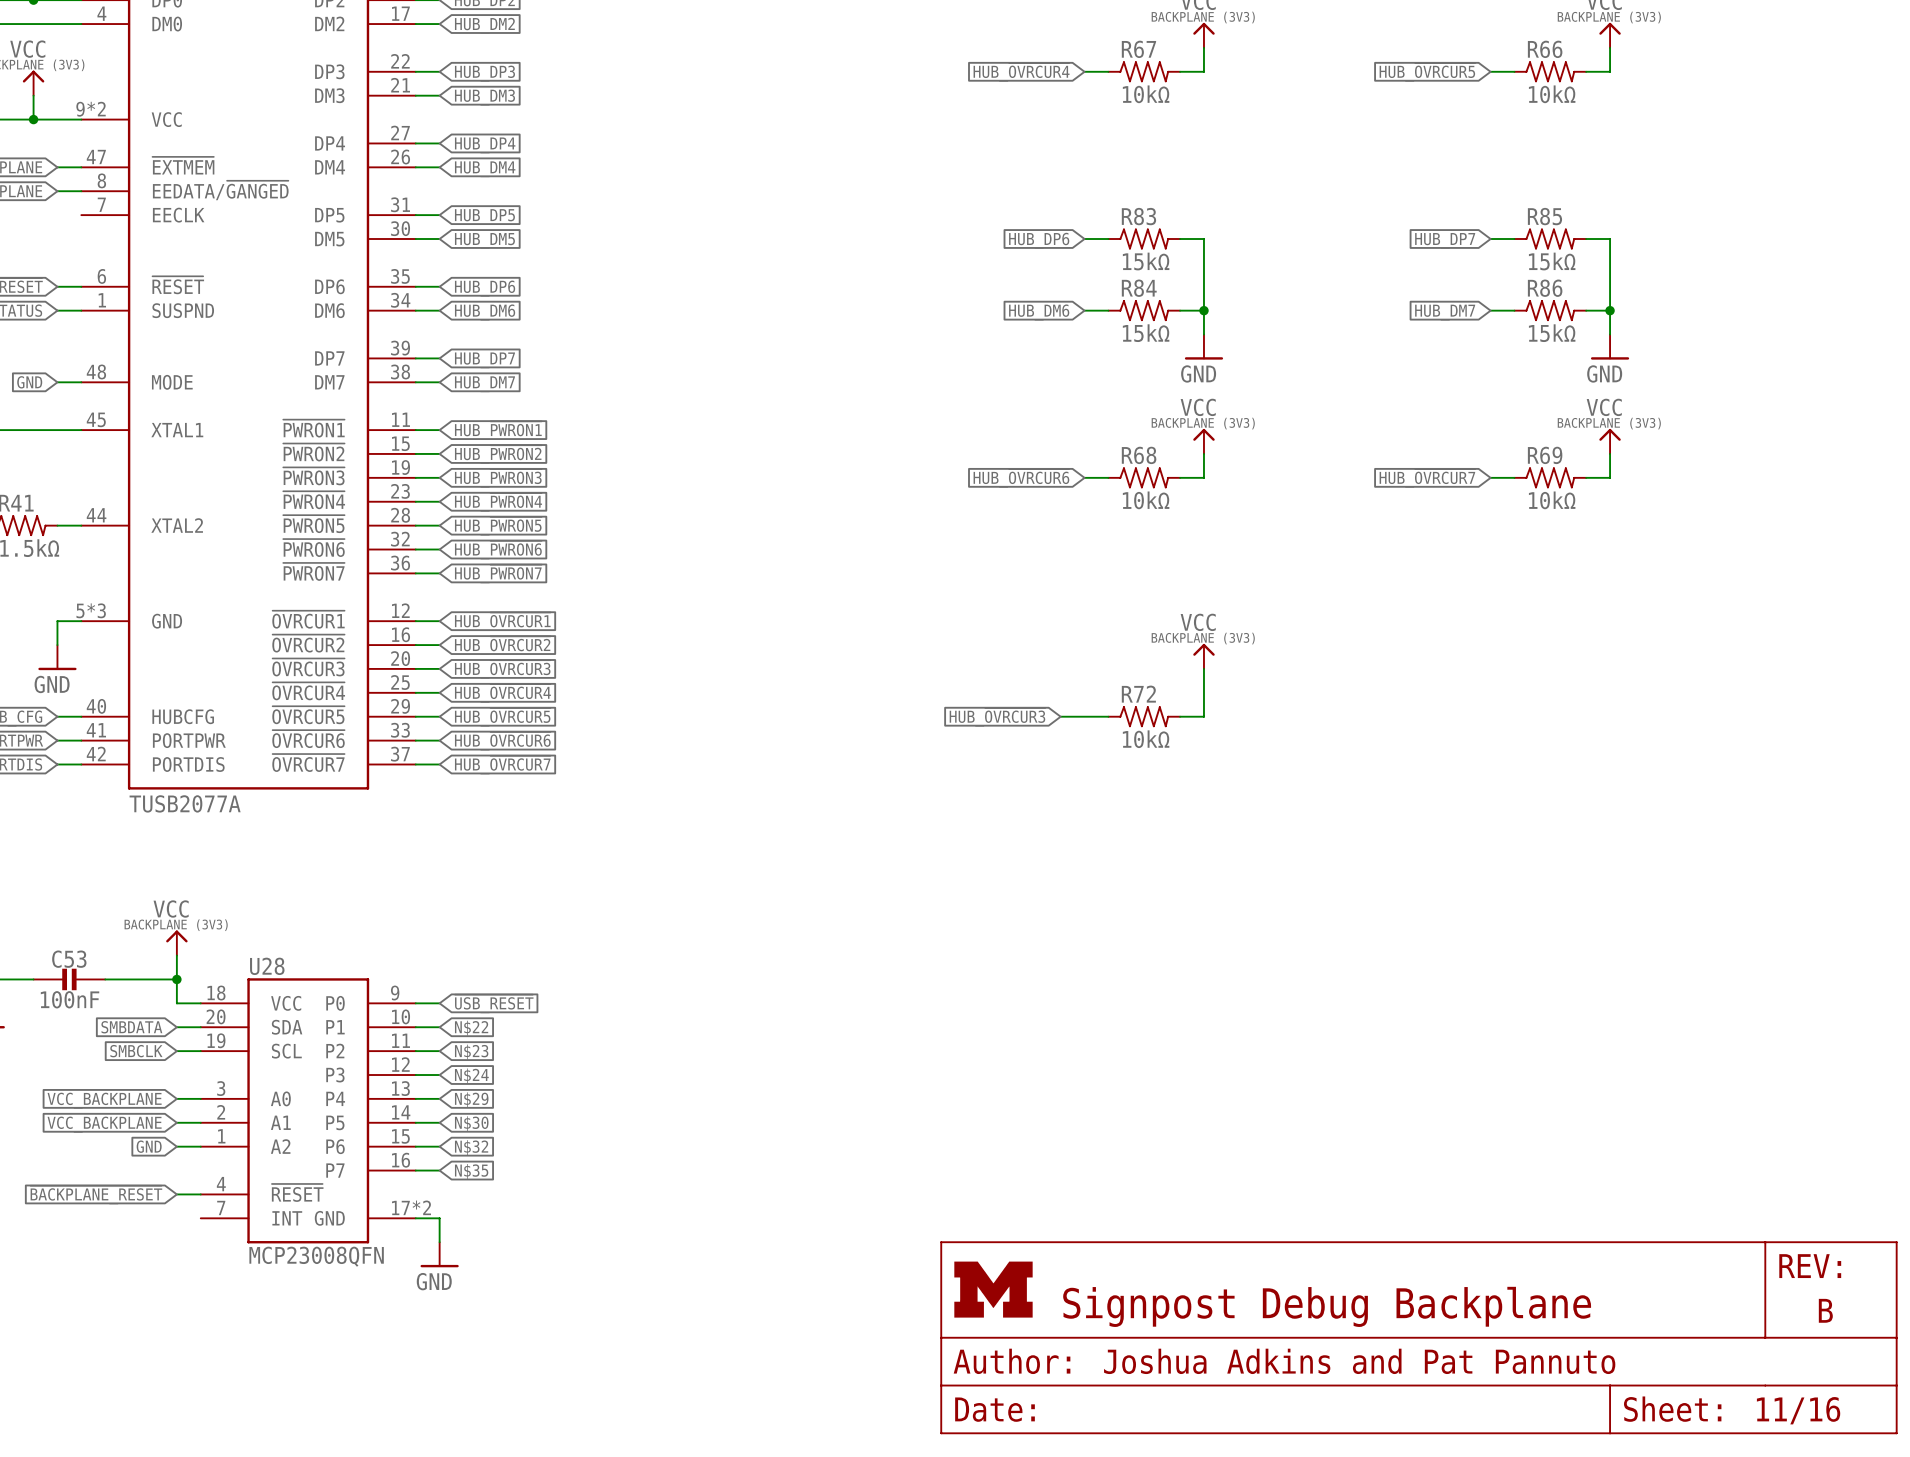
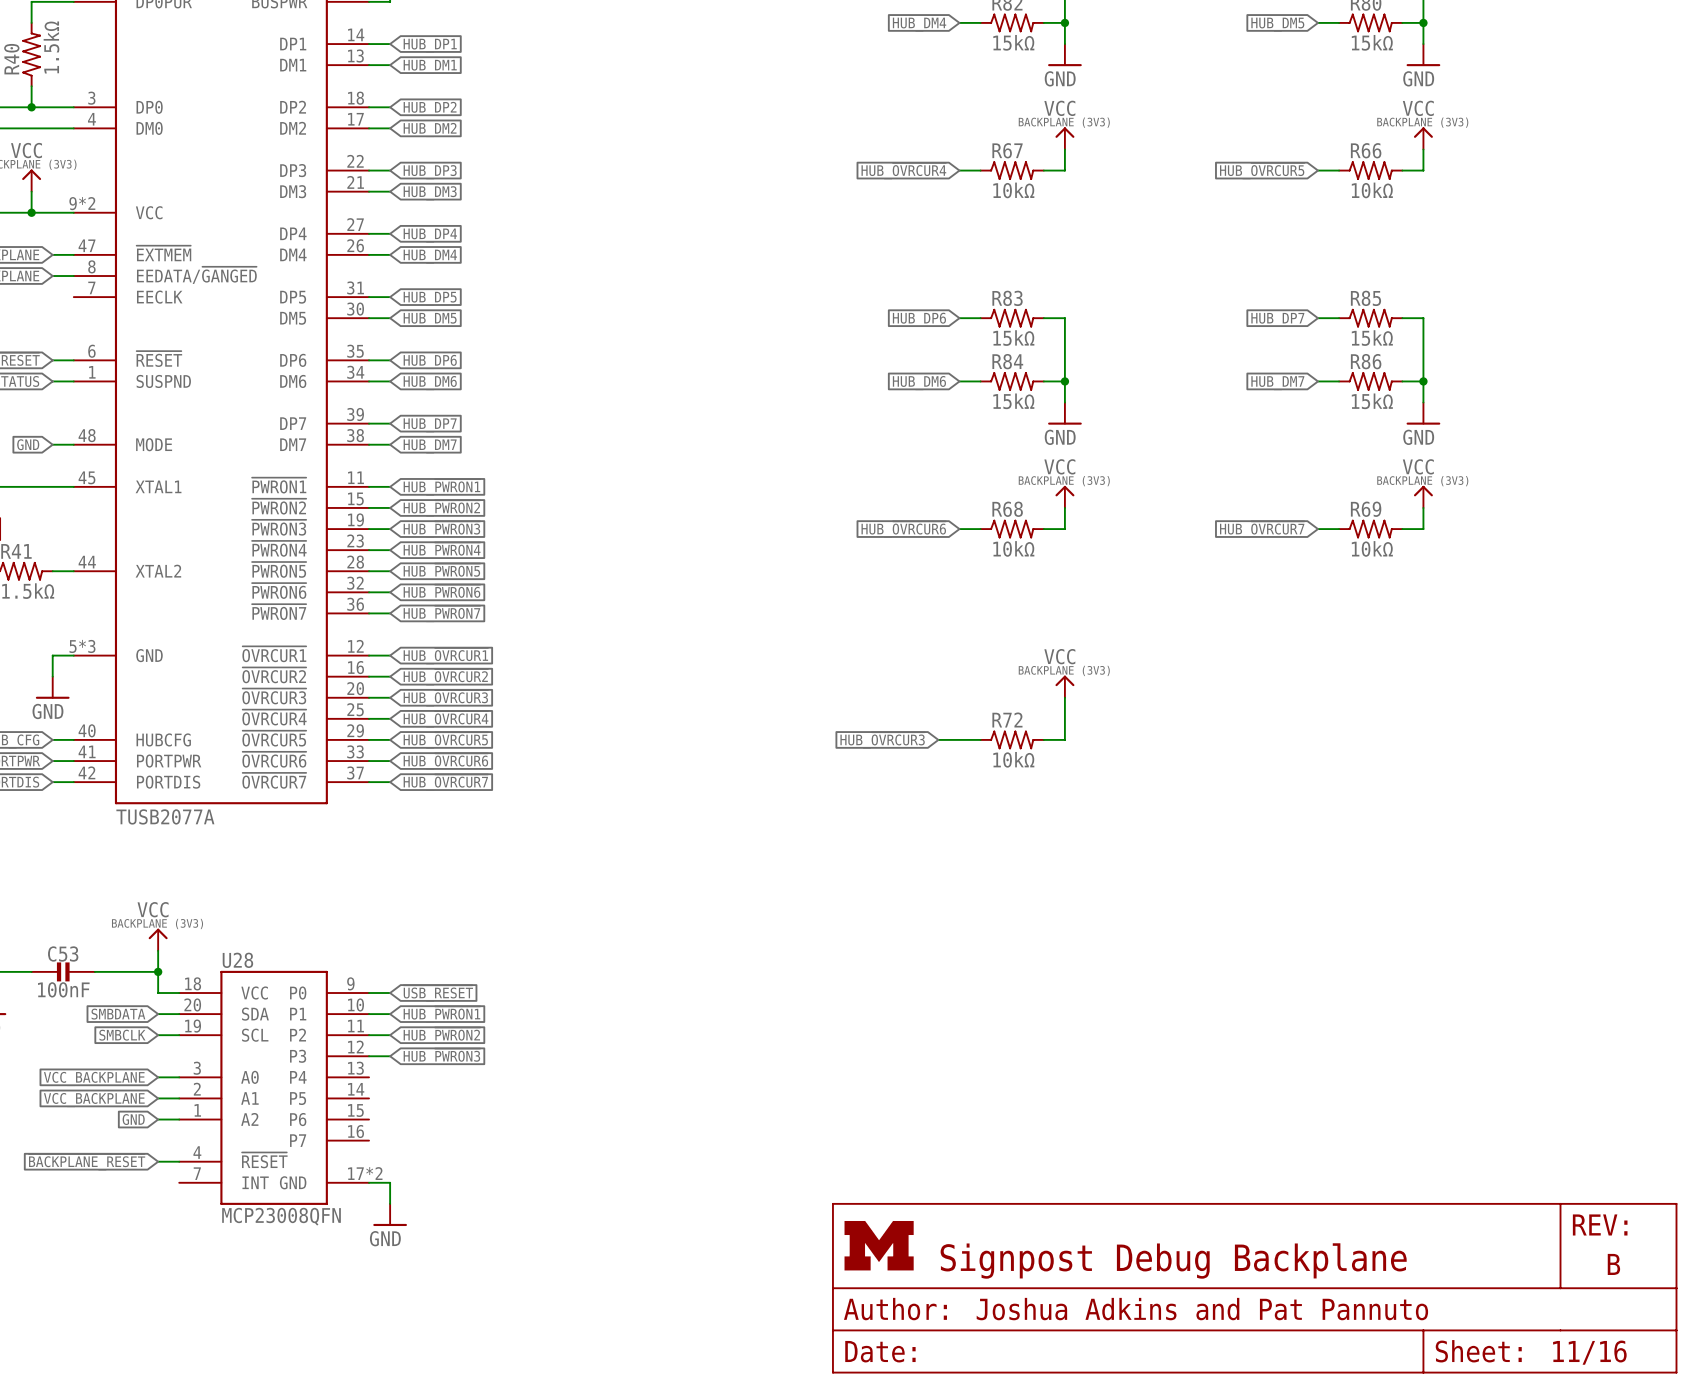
global label: N$22 (471, 1028) -> HUB_~{PWRON1} (441, 1014)
global label: N$23 (471, 1052) -> HUB_~{PWRON2} (441, 1035)
global label: N$24 (471, 1075) -> HUB_~{PWRON3} (441, 1056)
wire: (415, 1098) (439, 1098) -> none
global label: N$29 (471, 1099) -> none
wire: (415, 1122) (439, 1122) -> none
global label: N$30 (471, 1123) -> none
wire: (415, 1146) (439, 1146) -> none
global label: N$32 (471, 1147) -> none
wire: (415, 1170) (439, 1170) -> none
global label: N$35 (471, 1171) -> none

